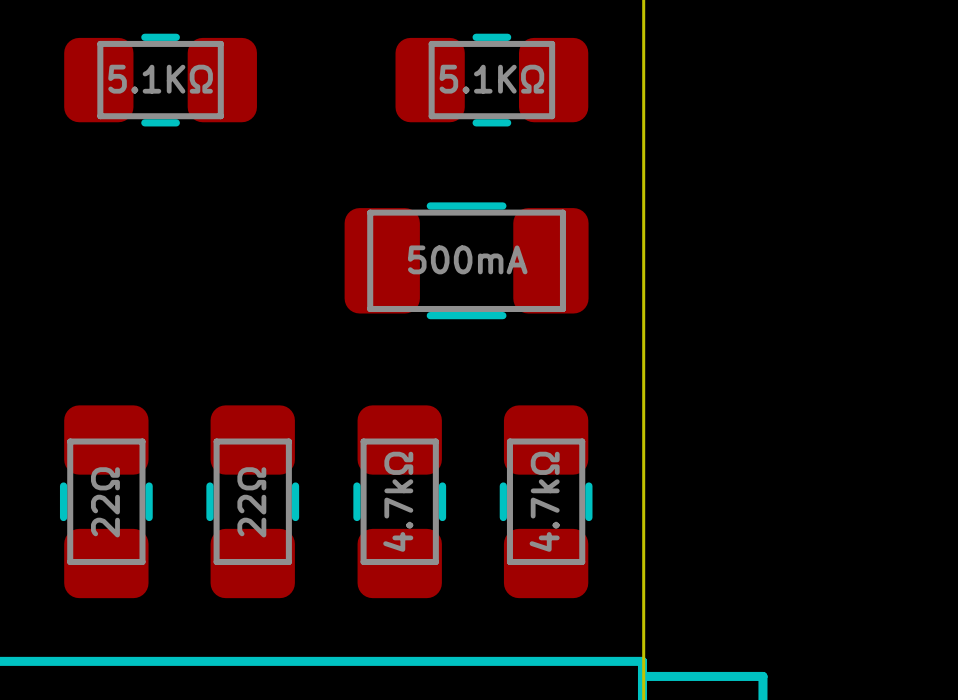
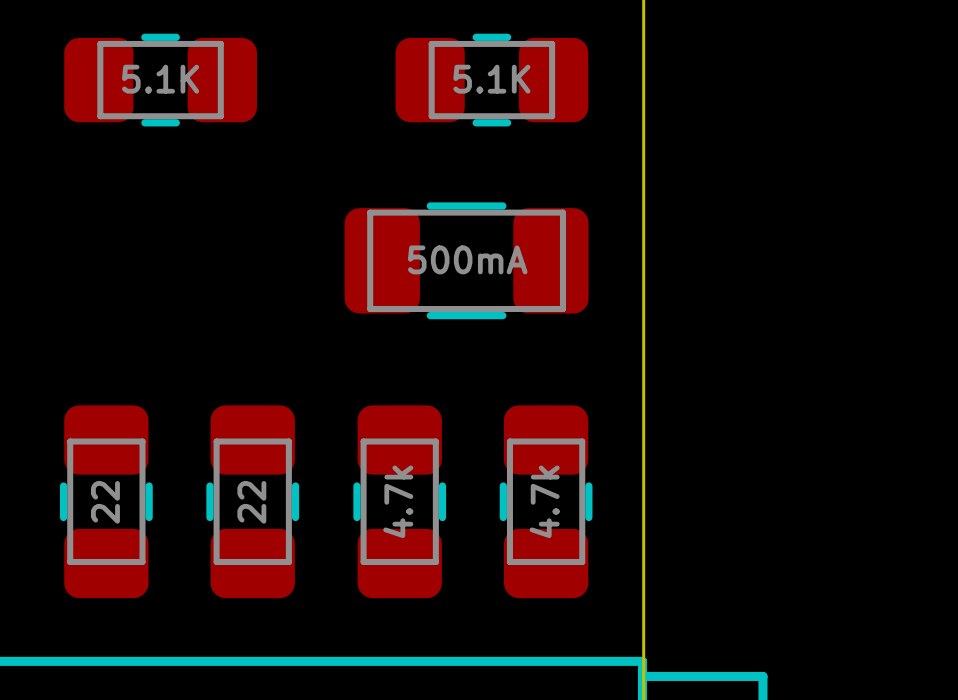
part value: 5.1KΩ (160, 79) -> 5.1K (160, 79)
part value: 5.1KΩ (491, 79) -> 5.1K (491, 79)
part value: 4.7kΩ (398, 501) -> 4.7k (398, 501)
part value: 4.7kΩ (544, 501) -> 4.7k (544, 501)
part value: 22Ω (105, 502) -> 22 (105, 502)
part value: 22Ω (251, 502) -> 22 (251, 502)

